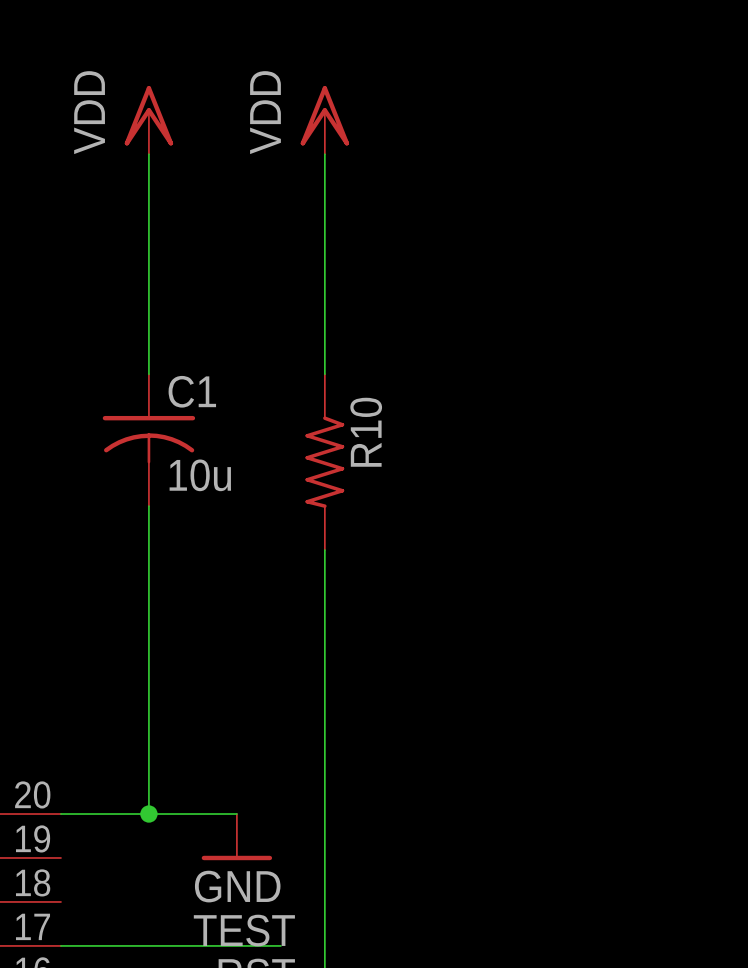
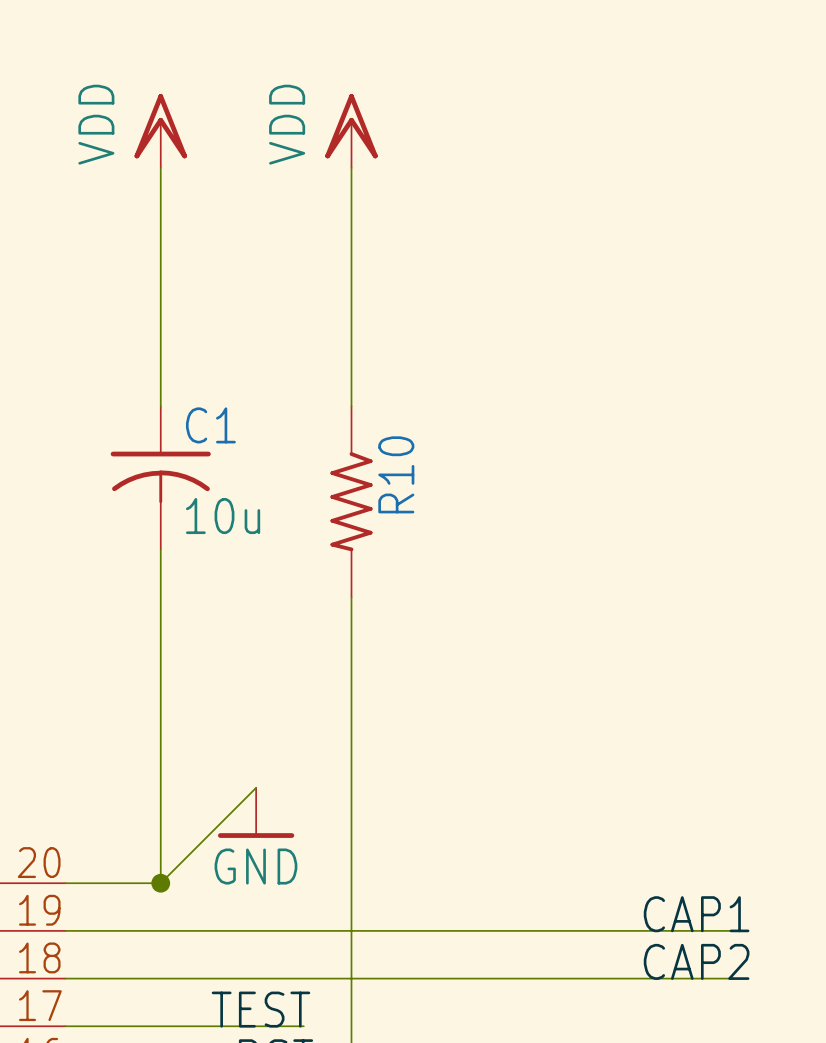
wire: (148, 814) (236, 814) -> (160, 883) (256, 787)
power symbol position: GND (236, 837) -> GND (256, 812)
label: none -> CAP1 (696, 914)
wire: none -> (65, 930) (732, 930)
label: none -> CAP2 (696, 961)
wire: none -> (65, 978) (732, 978)

